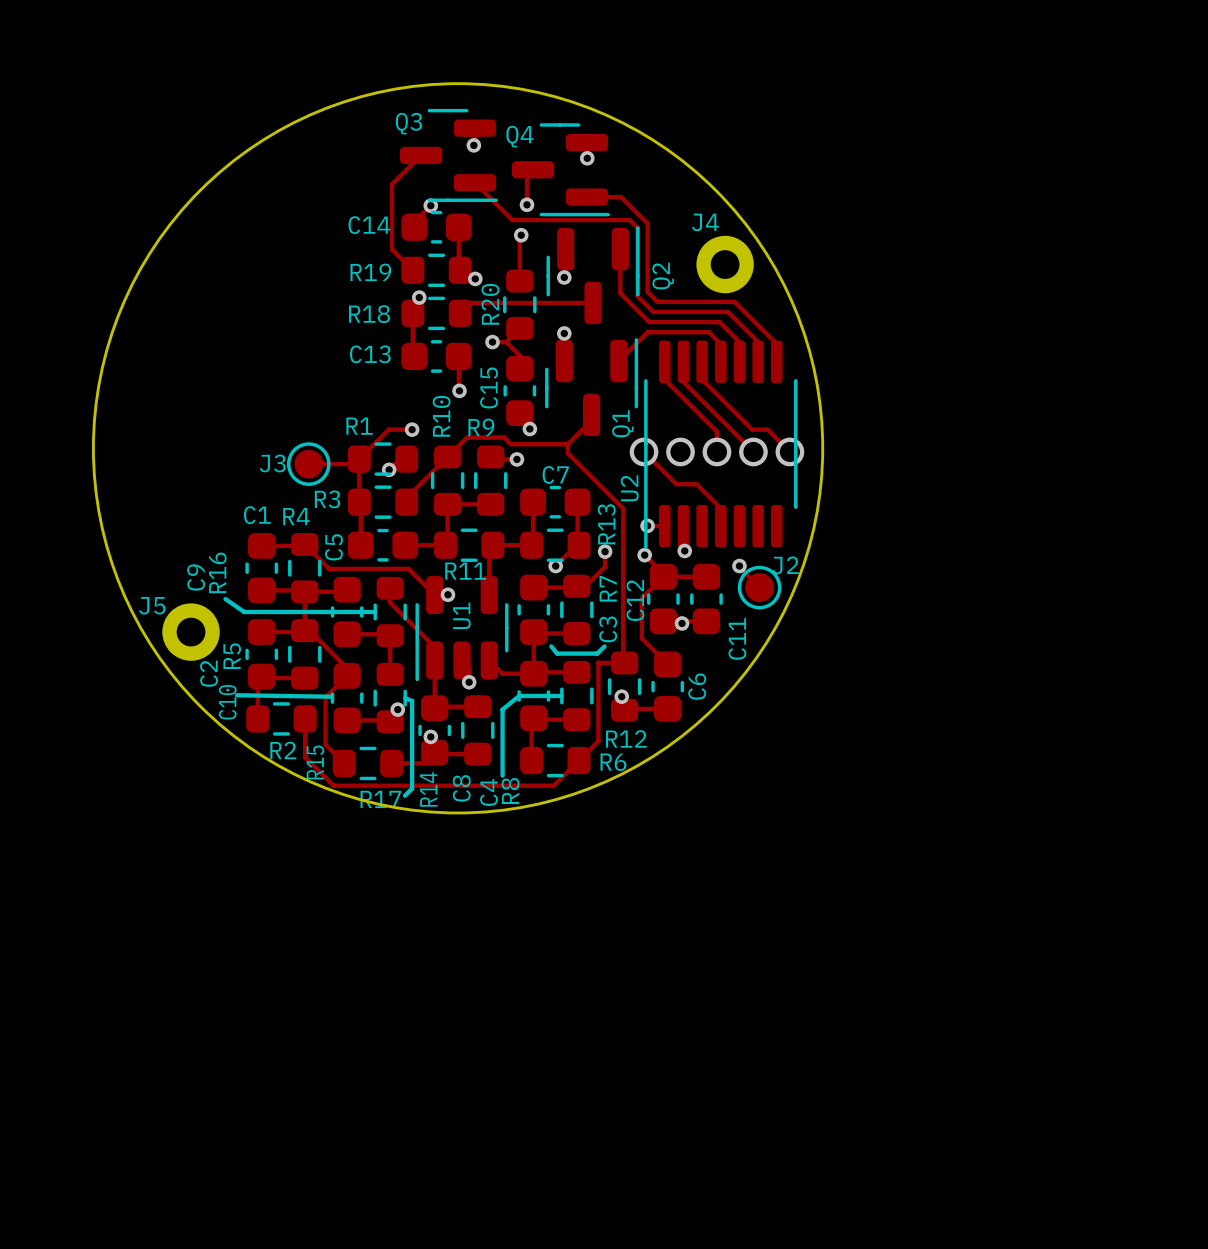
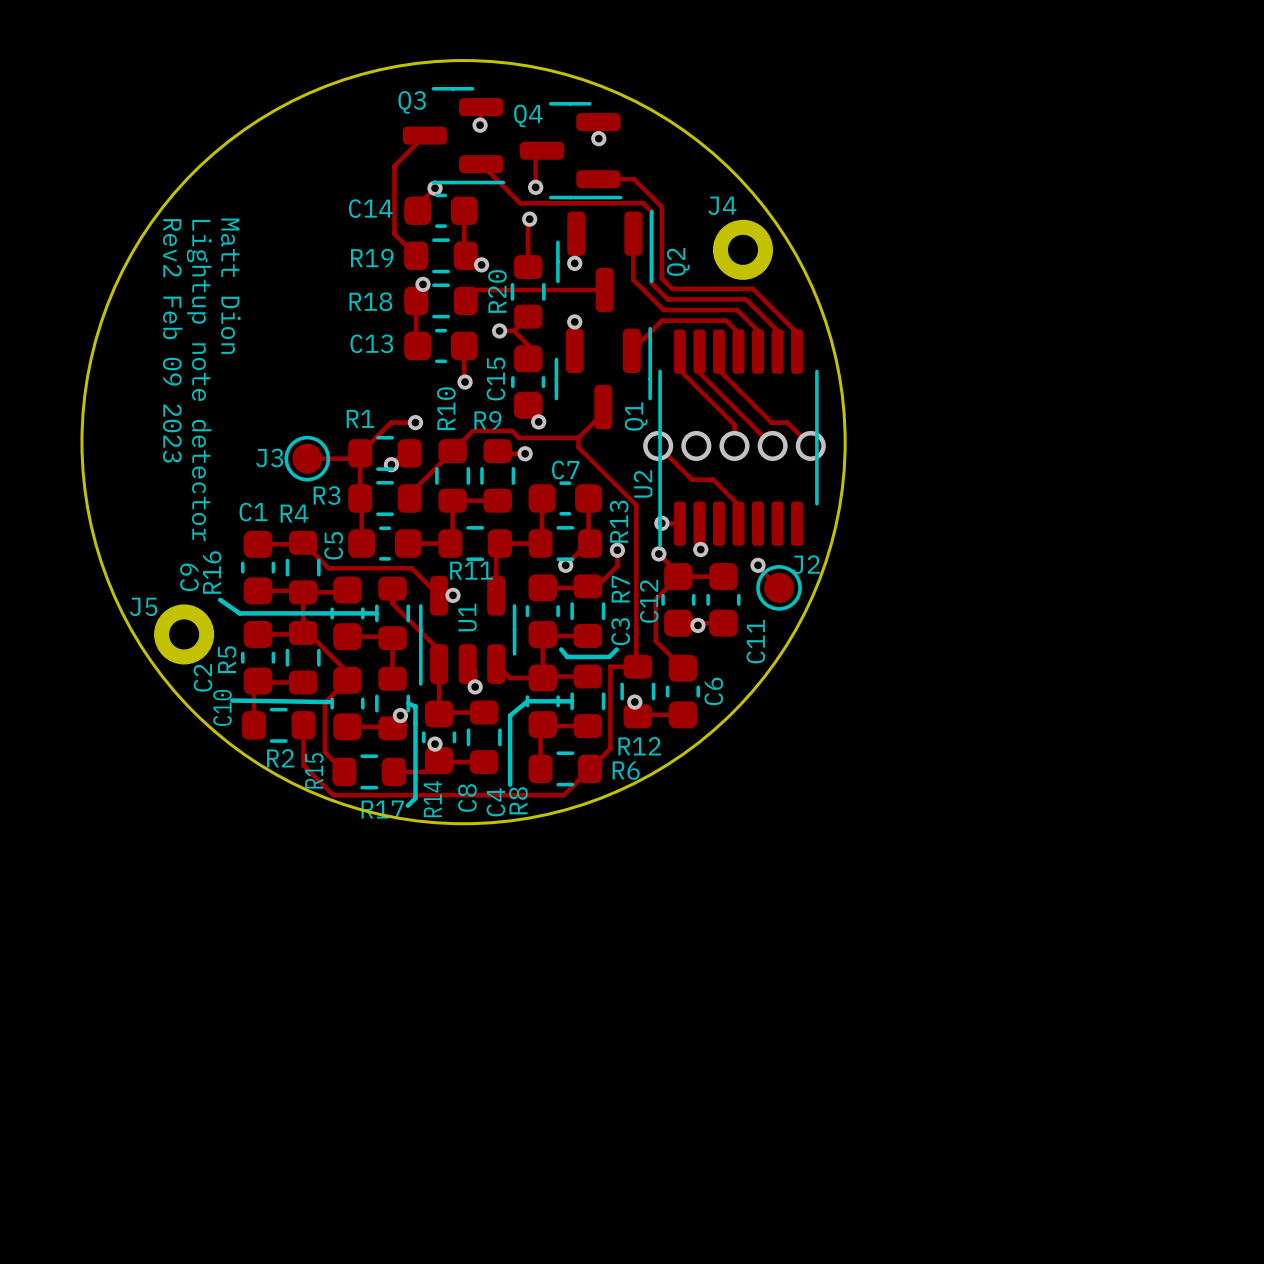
text: none -> Matt Dion (230, 286)
text: none -> Rev2 Feb 09 2023 (172, 340)
text: none -> Lightup note detector (199, 380)

